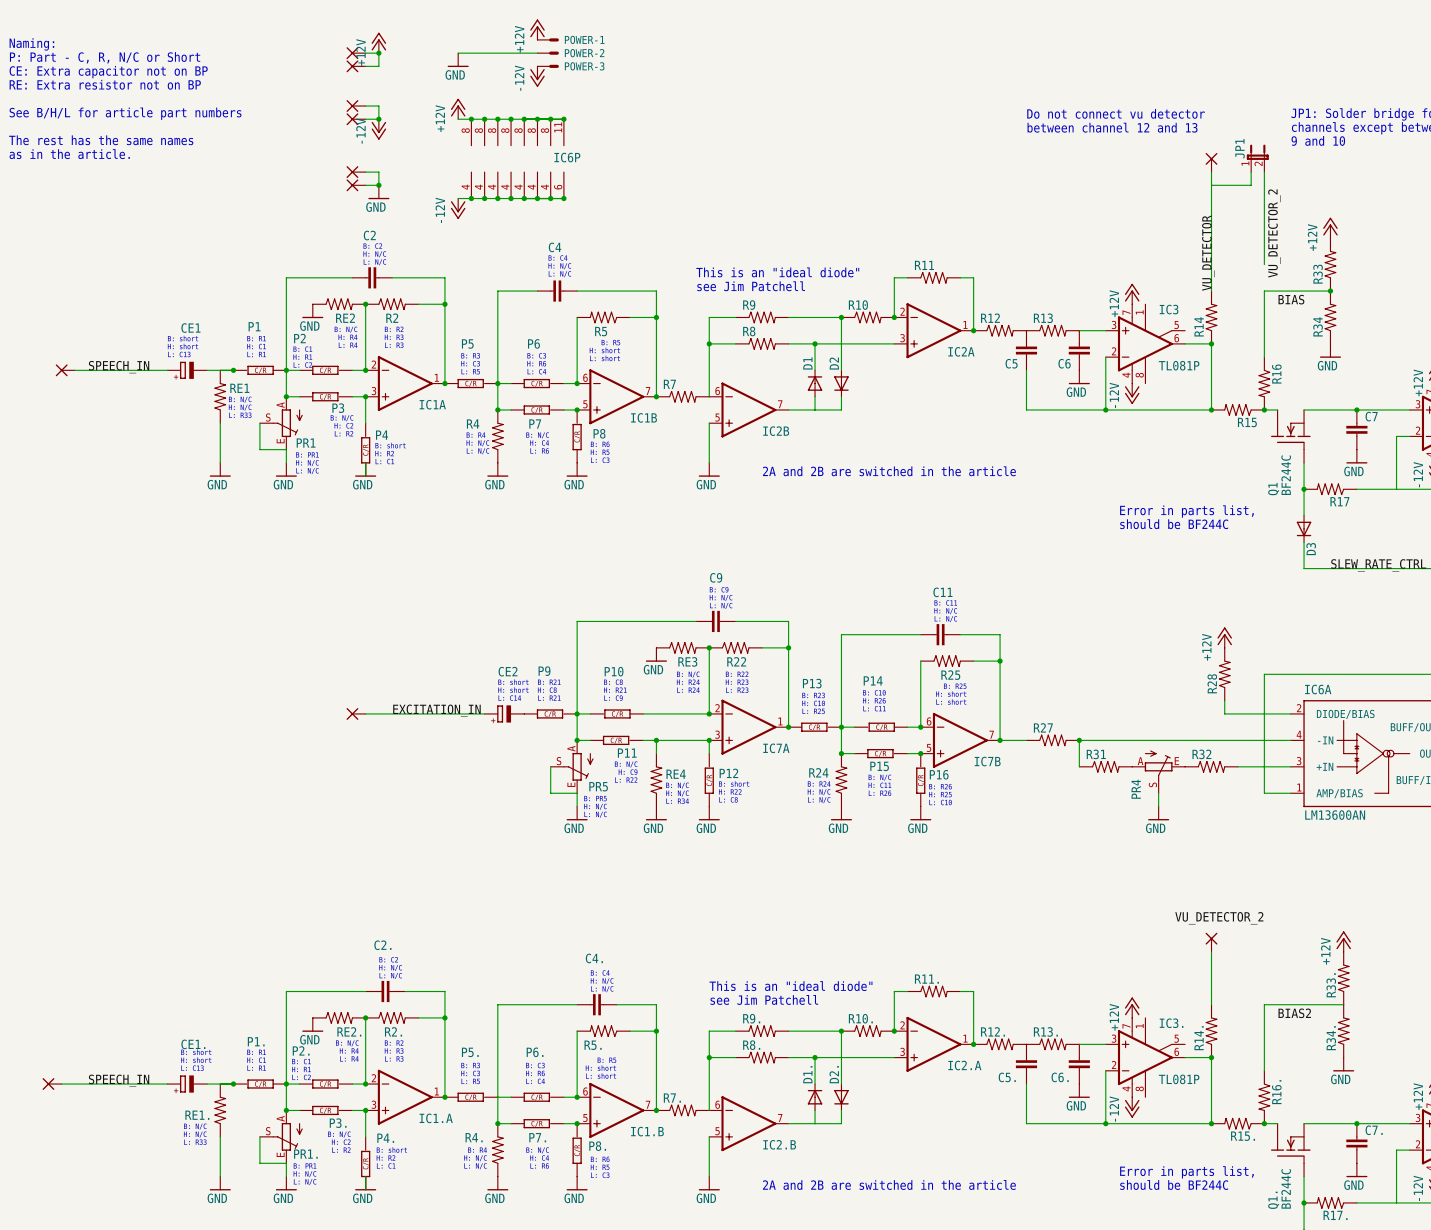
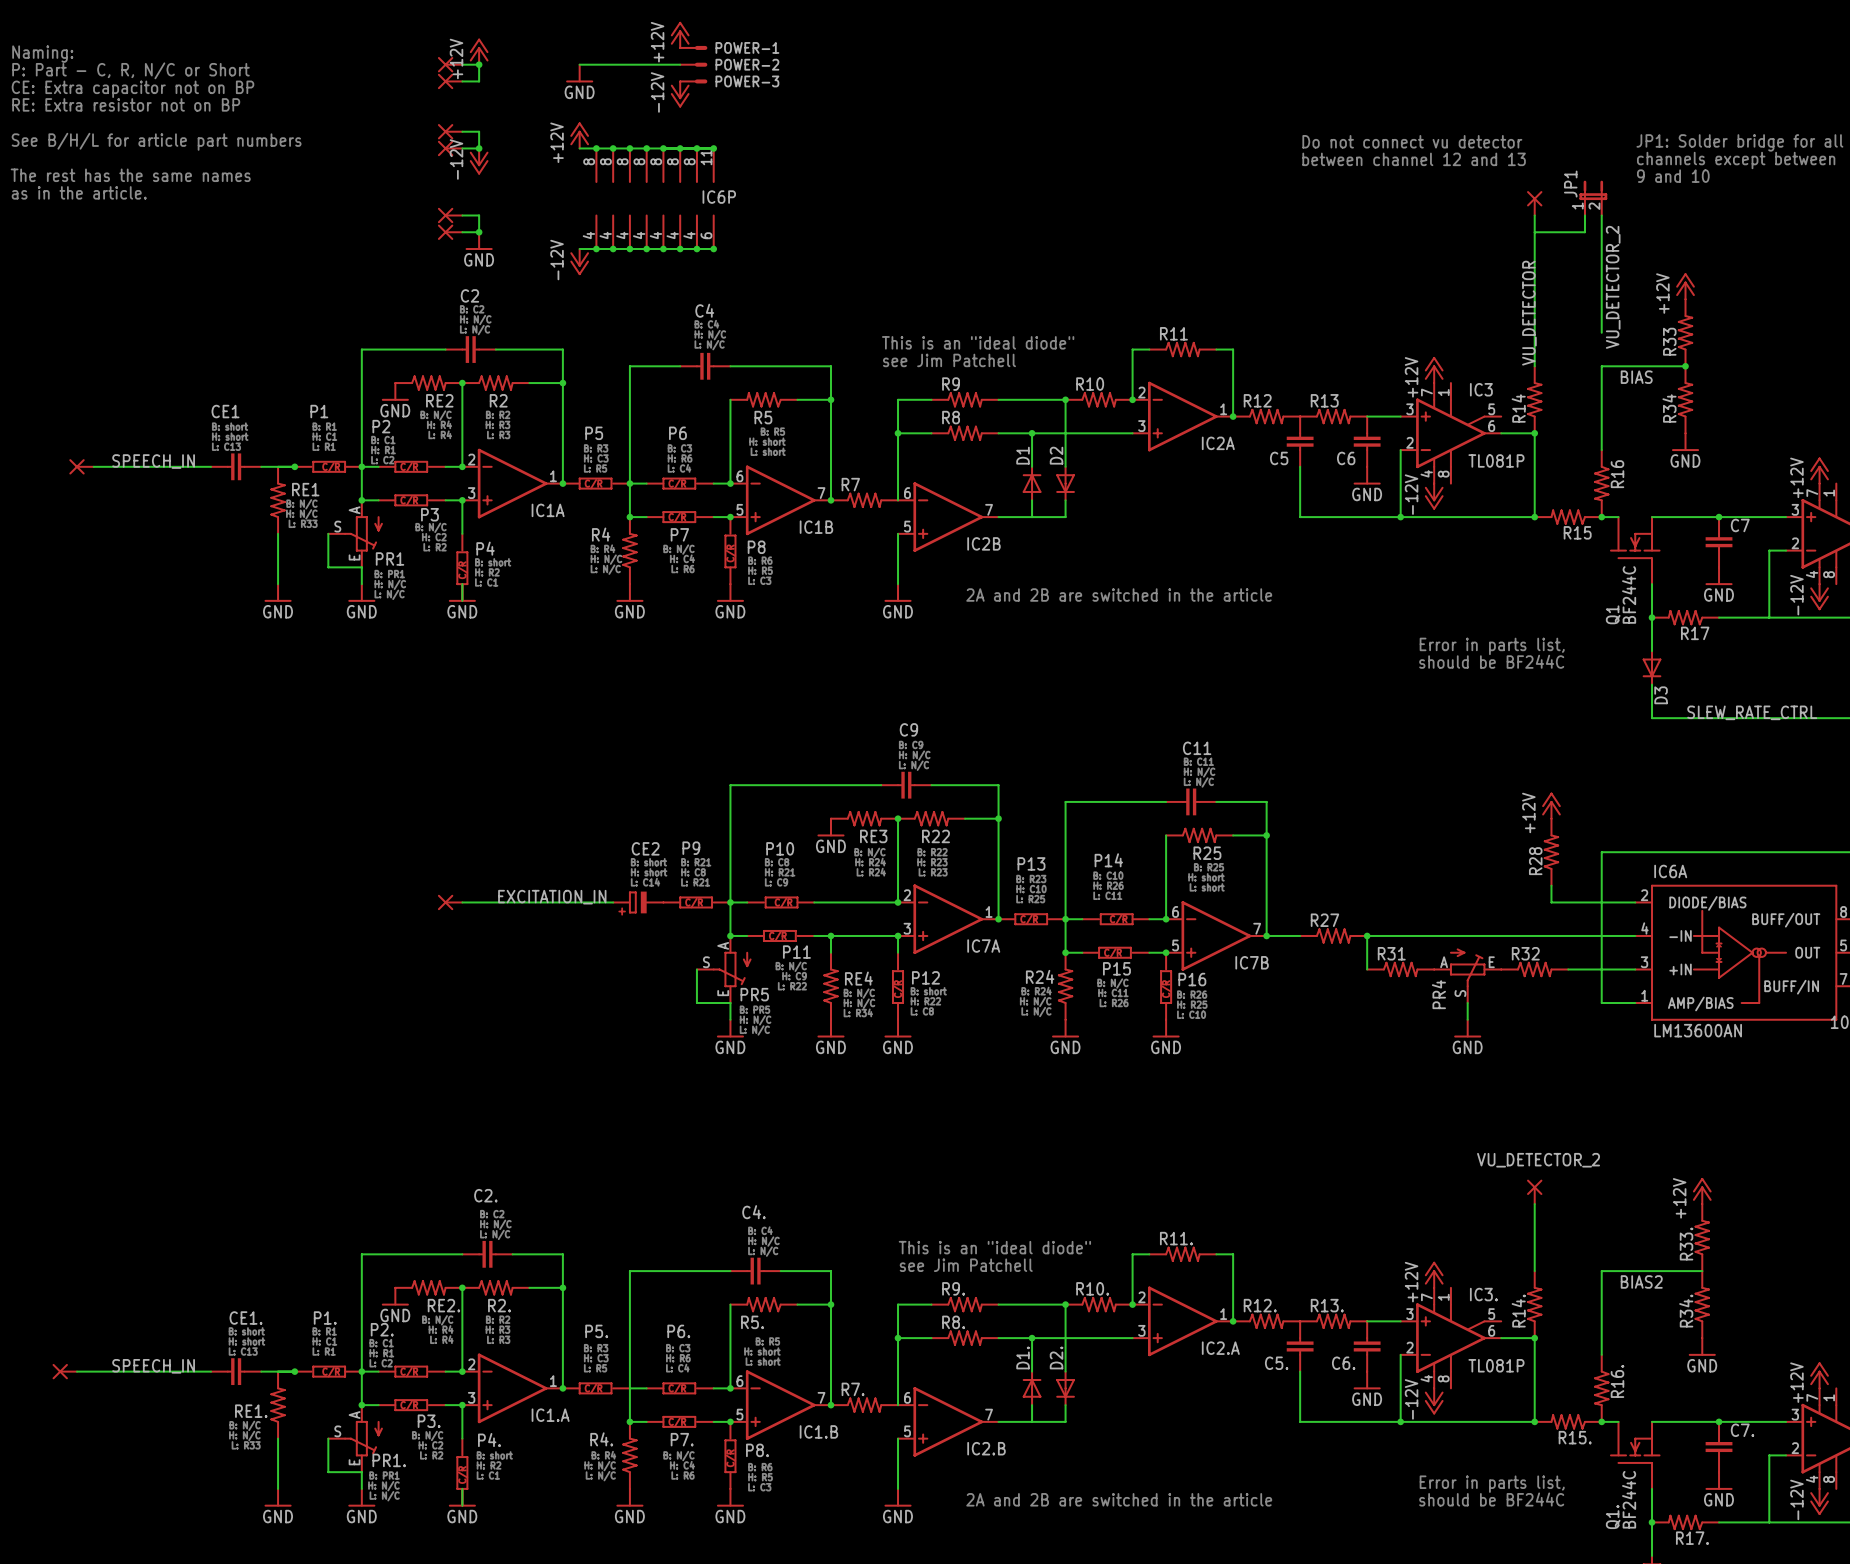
CE1 name position: CE1 (190, 328) -> CE1 (225, 411)
CE1 symbol: [167, 361, 208, 379] -> [211, 453, 262, 481]
CE1. symbol: [167, 1075, 208, 1093] -> [211, 1358, 262, 1386]

